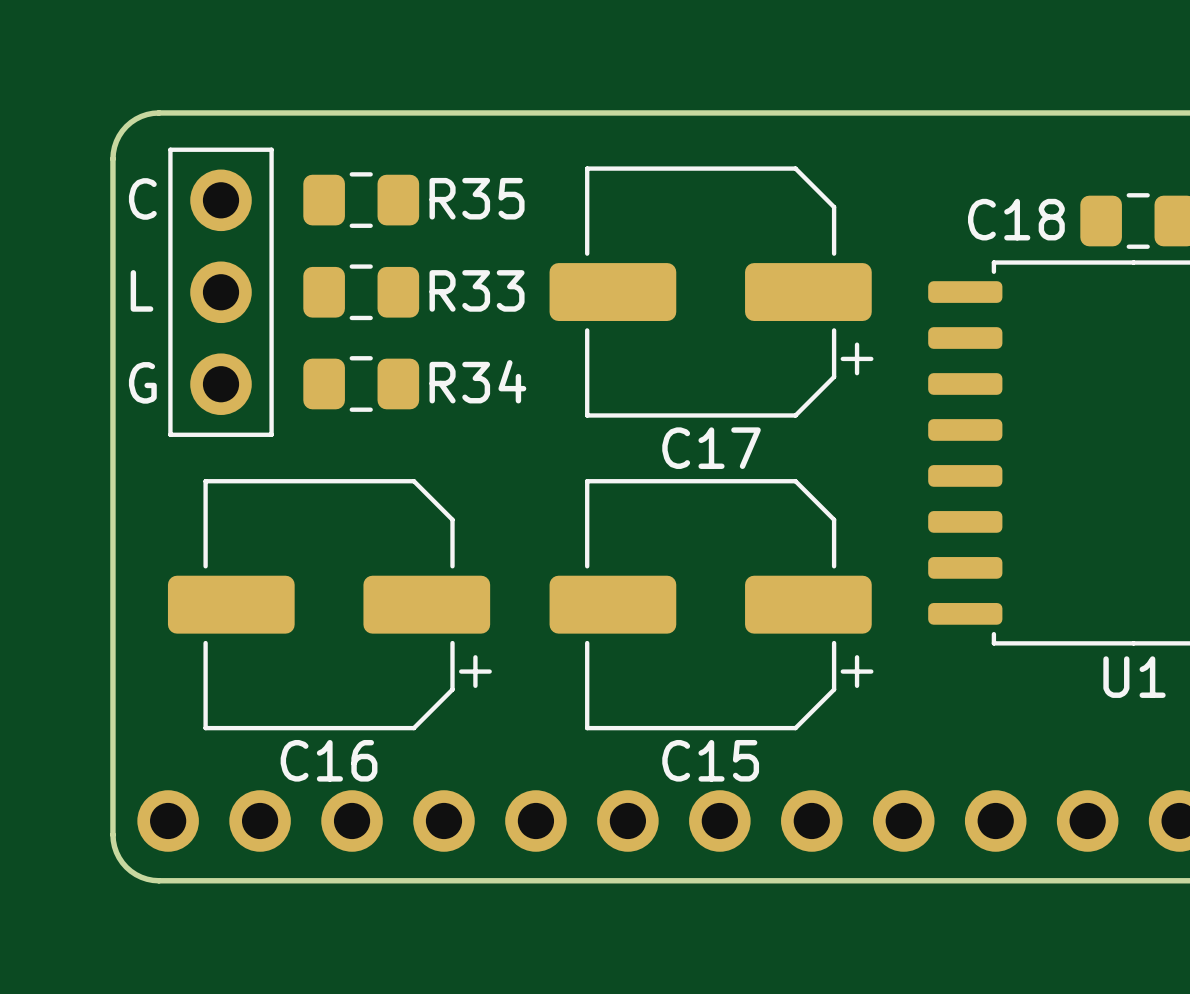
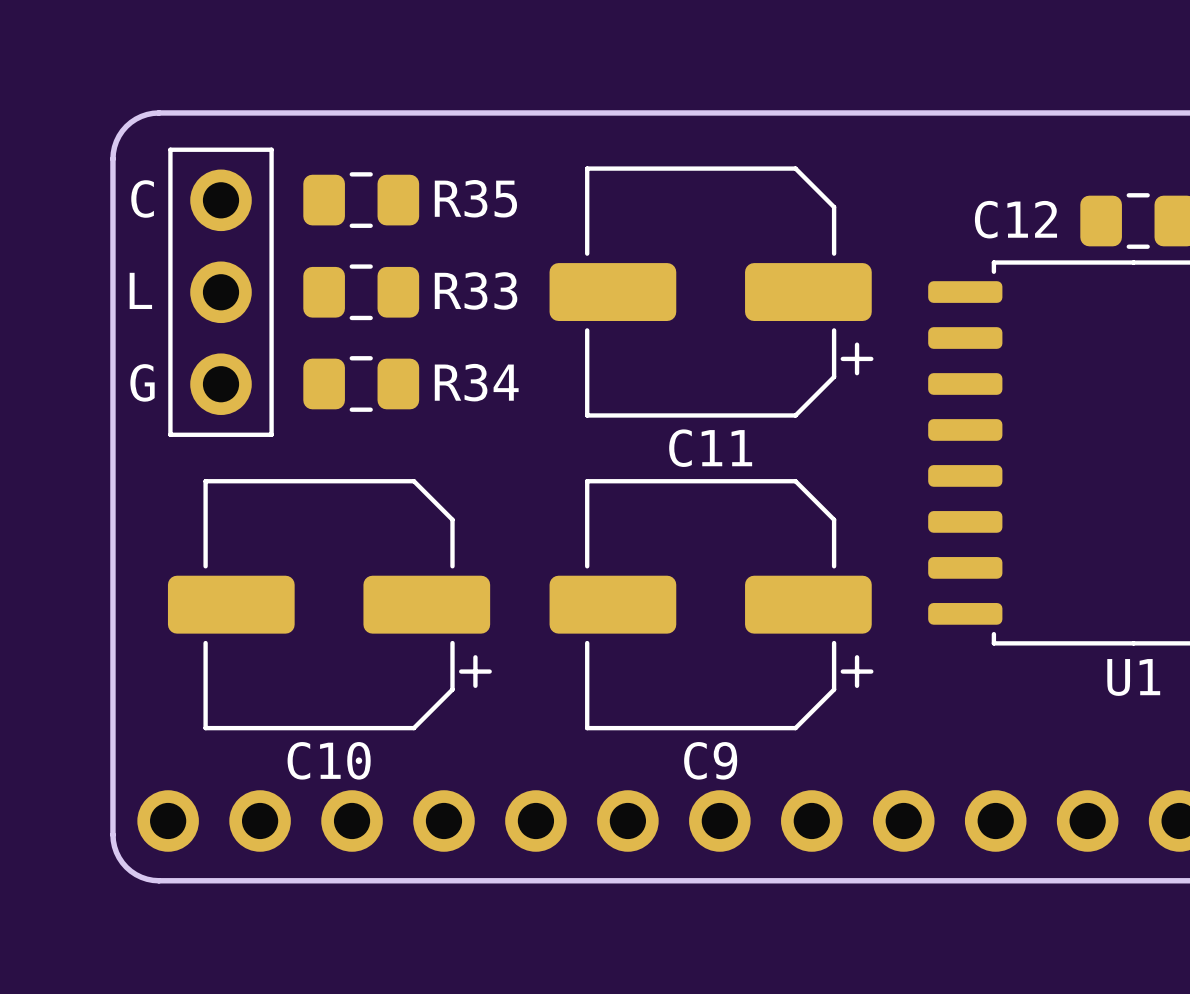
C18 name: C18 (1016, 219) -> C12 (1015, 219)
C17 name: C17 (711, 448) -> C11 (710, 448)
C16 name: C16 (329, 760) -> C10 (329, 760)
C15 name: C15 (710, 760) -> C9 (710, 760)

